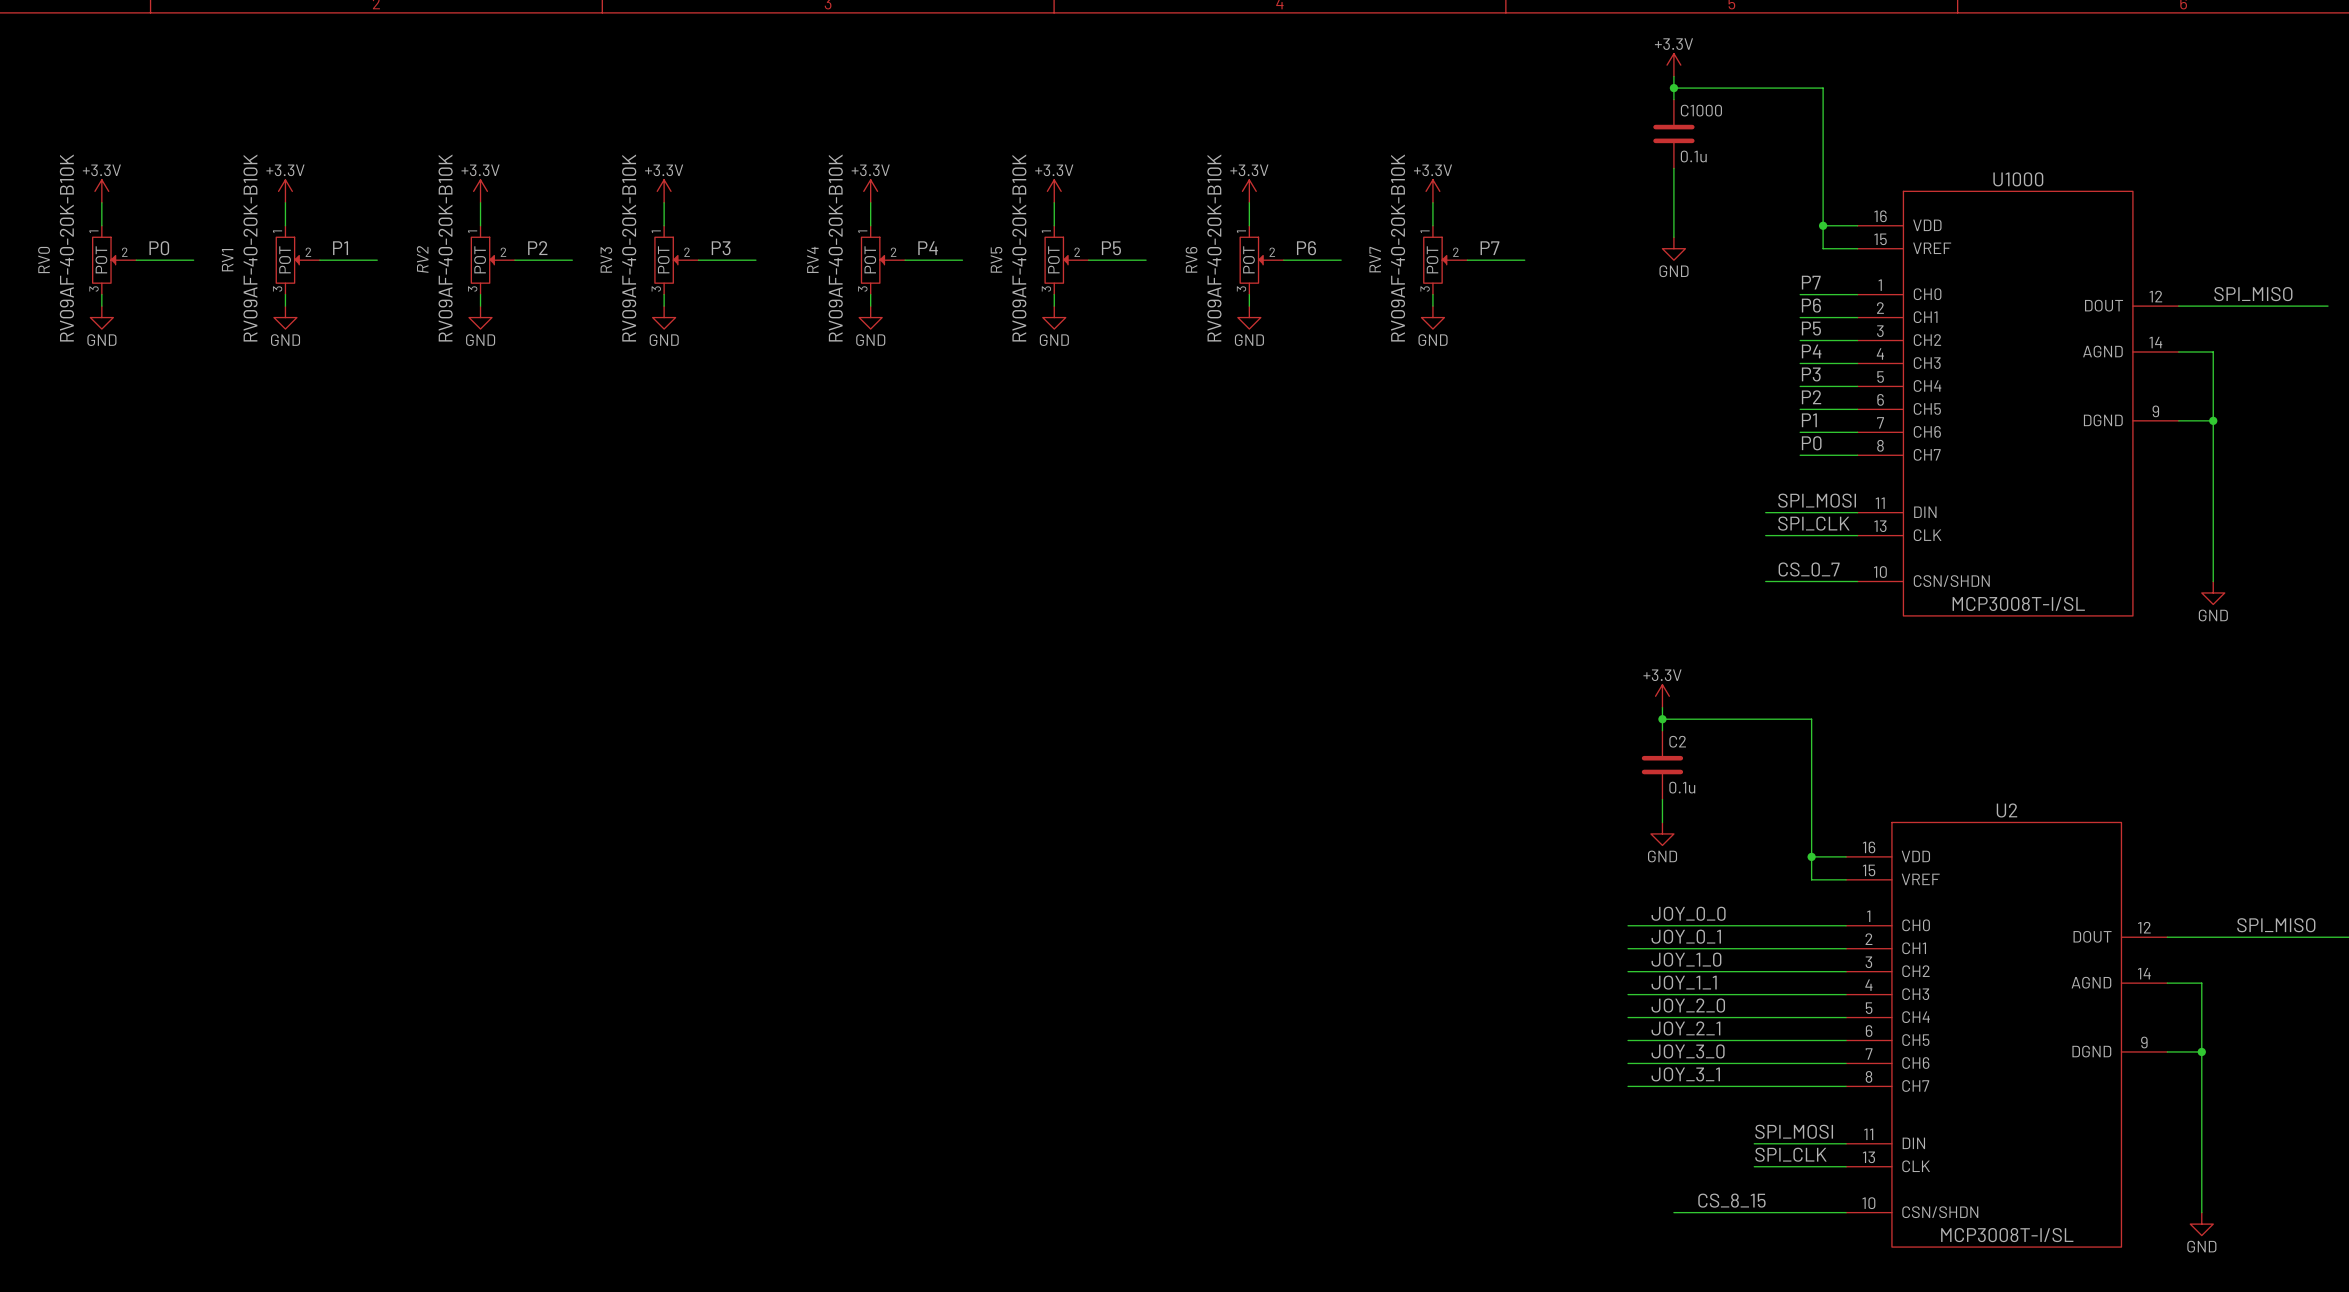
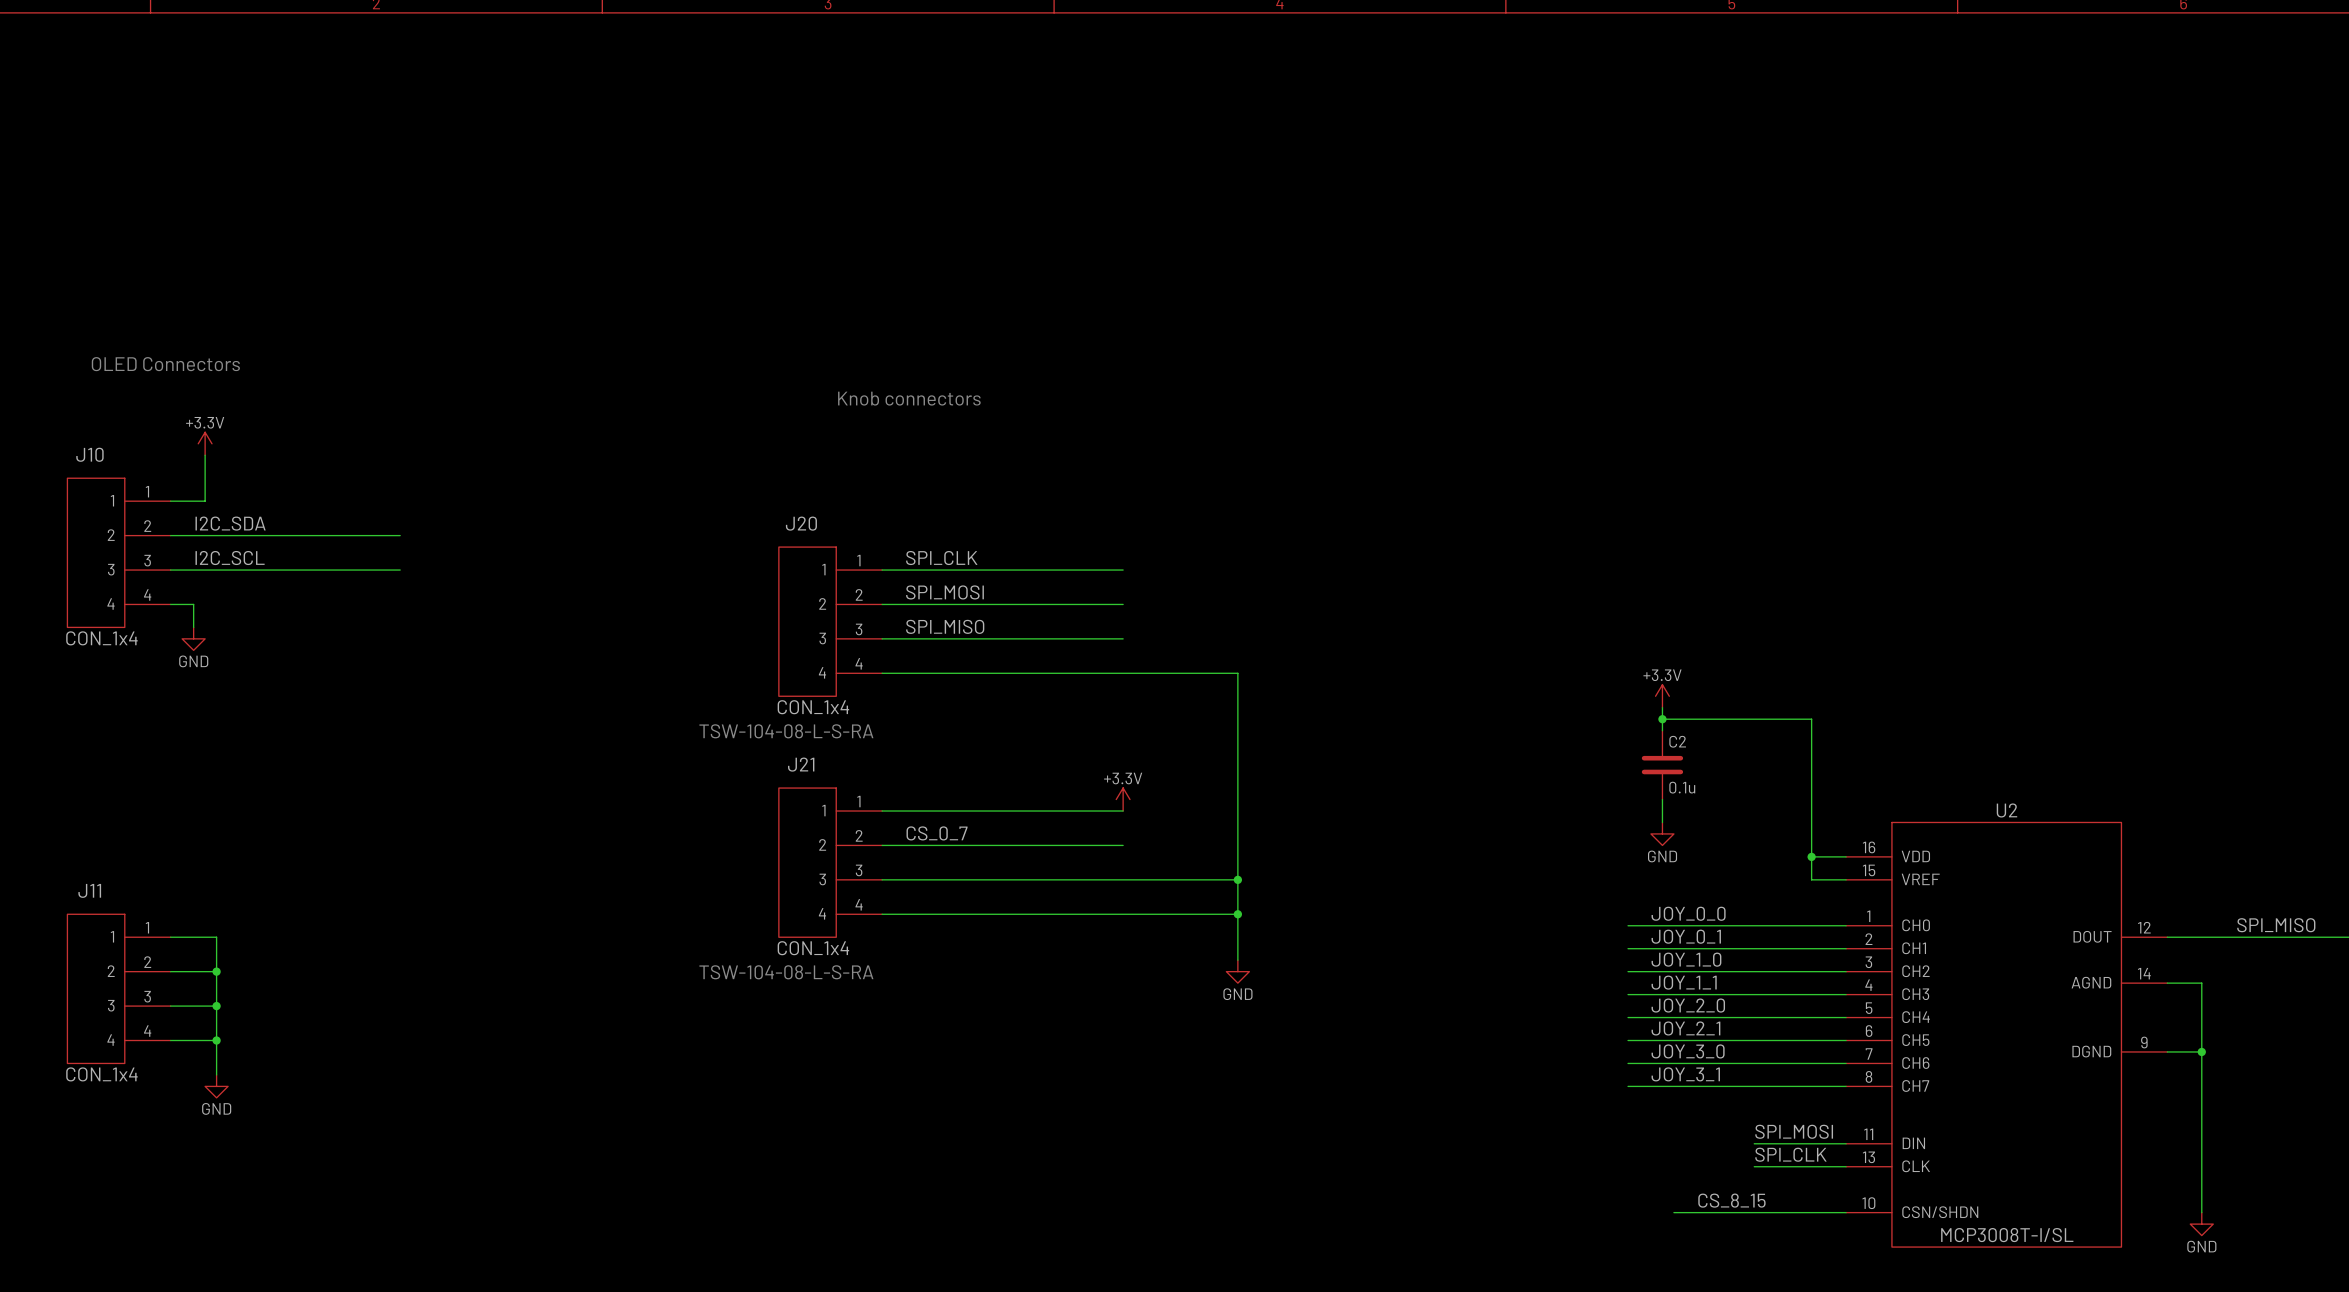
power symbol: +3.3V (1673, 65) -> none
wire: (1673, 76) (1673, 99) -> none
wire: (1673, 88) (1823, 88) (1823, 248) (1857, 248) -> none
junction: (1673, 88) -> none
C1000: 0.1u (1673, 133) -> none
wire: (1673, 168) (1673, 237) -> none
power symbol: +3.3V (101, 191) -> none
power symbol: +3.3V (285, 191) -> none
power symbol: +3.3V (480, 191) -> none
power symbol: +3.3V (664, 191) -> none
power symbol: +3.3V (870, 191) -> none
power symbol: +3.3V (1054, 191) -> none
power symbol: +3.3V (1249, 191) -> none
power symbol: +3.3V (1432, 191) -> none
wire: (101, 202) (101, 225) -> none
wire: (285, 202) (285, 225) -> none
wire: (480, 202) (480, 225) -> none
wire: (664, 202) (664, 225) -> none
wire: (870, 202) (870, 225) -> none
wire: (1054, 202) (1054, 225) -> none
wire: (1249, 202) (1249, 225) -> none
wire: (1432, 202) (1432, 225) -> none
wire: (1823, 225) (1857, 225) -> none
junction: (1823, 225) -> none
label: P0 (159, 248) -> none
label: P1 (340, 248) -> none
label: P2 (537, 248) -> none
label: P3 (721, 248) -> none
label: P4 (928, 248) -> none
label: P5 (1111, 248) -> none
label: P6 (1306, 248) -> none
label: P7 (1489, 248) -> none
power symbol: GND (1673, 248) -> none
RV0: POT (114, 260) -> none
wire: (136, 260) (193, 260) -> none
RV1: POT (298, 260) -> none
wire: (319, 260) (377, 260) -> none
RV2: POT (493, 260) -> none
wire: (514, 260) (572, 260) -> none
RV3: POT (676, 260) -> none
wire: (698, 260) (755, 260) -> none
RV4: POT (883, 260) -> none
wire: (905, 260) (962, 260) -> none
RV5: POT (1066, 260) -> none
wire: (1088, 260) (1146, 260) -> none
RV6: POT (1261, 260) -> none
wire: (1283, 260) (1341, 260) -> none
RV7: POT (1445, 260) -> none
wire: (1467, 260) (1524, 260) -> none
label: P7 (1811, 282) -> none
wire: (101, 294) (101, 306) -> none
wire: (285, 294) (285, 306) -> none
wire: (480, 294) (480, 306) -> none
wire: (664, 294) (664, 306) -> none
wire: (870, 294) (870, 306) -> none
wire: (1054, 294) (1054, 306) -> none
wire: (1249, 294) (1249, 306) -> none
wire: (1432, 294) (1432, 306) -> none
wire: (1800, 294) (1857, 294) -> none
label: SPI_MISO (2253, 294) -> none
label: P6 (1811, 305) -> none
wire: (2178, 306) (2328, 306) -> none
power symbol: GND (101, 317) -> none
power symbol: GND (285, 317) -> none
power symbol: GND (480, 317) -> none
power symbol: GND (664, 317) -> none
power symbol: GND (870, 317) -> none
power symbol: GND (1054, 317) -> none
power symbol: GND (1249, 317) -> none
power symbol: GND (1432, 317) -> none
wire: (1800, 317) (1857, 317) -> none
label: P5 (1811, 328) -> none
wire: (1800, 340) (1857, 340) -> none
label: P4 (1811, 351) -> none
wire: (2178, 352) (2213, 352) (2213, 581) -> none
wire: (1800, 363) (1857, 363) -> none
text: none -> OLED Connectors (165, 364)
label: P3 (1811, 374) -> none
wire: (1800, 386) (1857, 386) -> none
label: P2 (1811, 397) -> none
text: none -> Knob connectors (909, 398)
U1000: MCP3008T-I/SL (2018, 403) -> none
wire: (1800, 409) (1857, 409) -> none
label: P1 (1809, 420) -> none
wire: (2178, 420) (2213, 420) -> none
junction: (2213, 420) -> none
wire: (1800, 432) (1857, 432) -> none
power symbol: none -> +3.3V (205, 443)
label: P0 (1811, 443) -> none
wire: none -> (205, 455) (205, 501) (170, 501)
wire: (1800, 455) (1857, 455) -> none
label: SPI_MOSI (1817, 500) -> none
wire: (1765, 512) (1857, 512) -> none
label: none -> I2C_SDA (230, 523)
label: SPI_CLK (1813, 523) -> none
wire: none -> (170, 535) (400, 535)
wire: (1765, 535) (1857, 535) -> none
J10: none -> CON_1x4 (119, 552)
label: none -> I2C_SCL (230, 558)
label: none -> SPI_CLK (941, 558)
label: CS_0_7 (1809, 569) -> none
wire: none -> (170, 570) (400, 570)
wire: none -> (882, 570) (1123, 570)
wire: (1765, 581) (1857, 581) -> none
label: none -> SPI_MOSI (945, 592)
power symbol: GND (2213, 592) -> none
wire: none -> (170, 604) (193, 604) (193, 627)
wire: none -> (882, 604) (1123, 604)
J20: none -> CON_1x4 (830, 621)
label: none -> SPI_MISO (945, 626)
power symbol: none -> GND (193, 638)
wire: none -> (882, 638) (1123, 638)
wire: none -> (882, 673) (1237, 673) (1237, 960)
text: none -> TSW-104-08-L-S-RA (786, 731)
power symbol: none -> +3.3V (1123, 799)
wire: none -> (882, 811) (1123, 811)
label: none -> CS_0_7 (937, 833)
wire: none -> (882, 845) (1123, 845)
J21: none -> CON_1x4 (830, 862)
wire: none -> (882, 879) (1237, 879)
junction: none -> (1237, 879)
wire: none -> (882, 914) (1237, 914)
junction: none -> (1237, 914)
wire: none -> (170, 937) (216, 937) (216, 1074)
wire: none -> (170, 971) (216, 971)
junction: none -> (216, 971)
power symbol: none -> GND (1237, 971)
text: none -> TSW-104-08-L-S-RA (786, 972)
J11: none -> CON_1x4 (119, 988)
wire: none -> (170, 1006) (216, 1006)
junction: none -> (216, 1006)
wire: none -> (170, 1040) (216, 1040)
junction: none -> (216, 1040)
power symbol: none -> GND (216, 1086)

